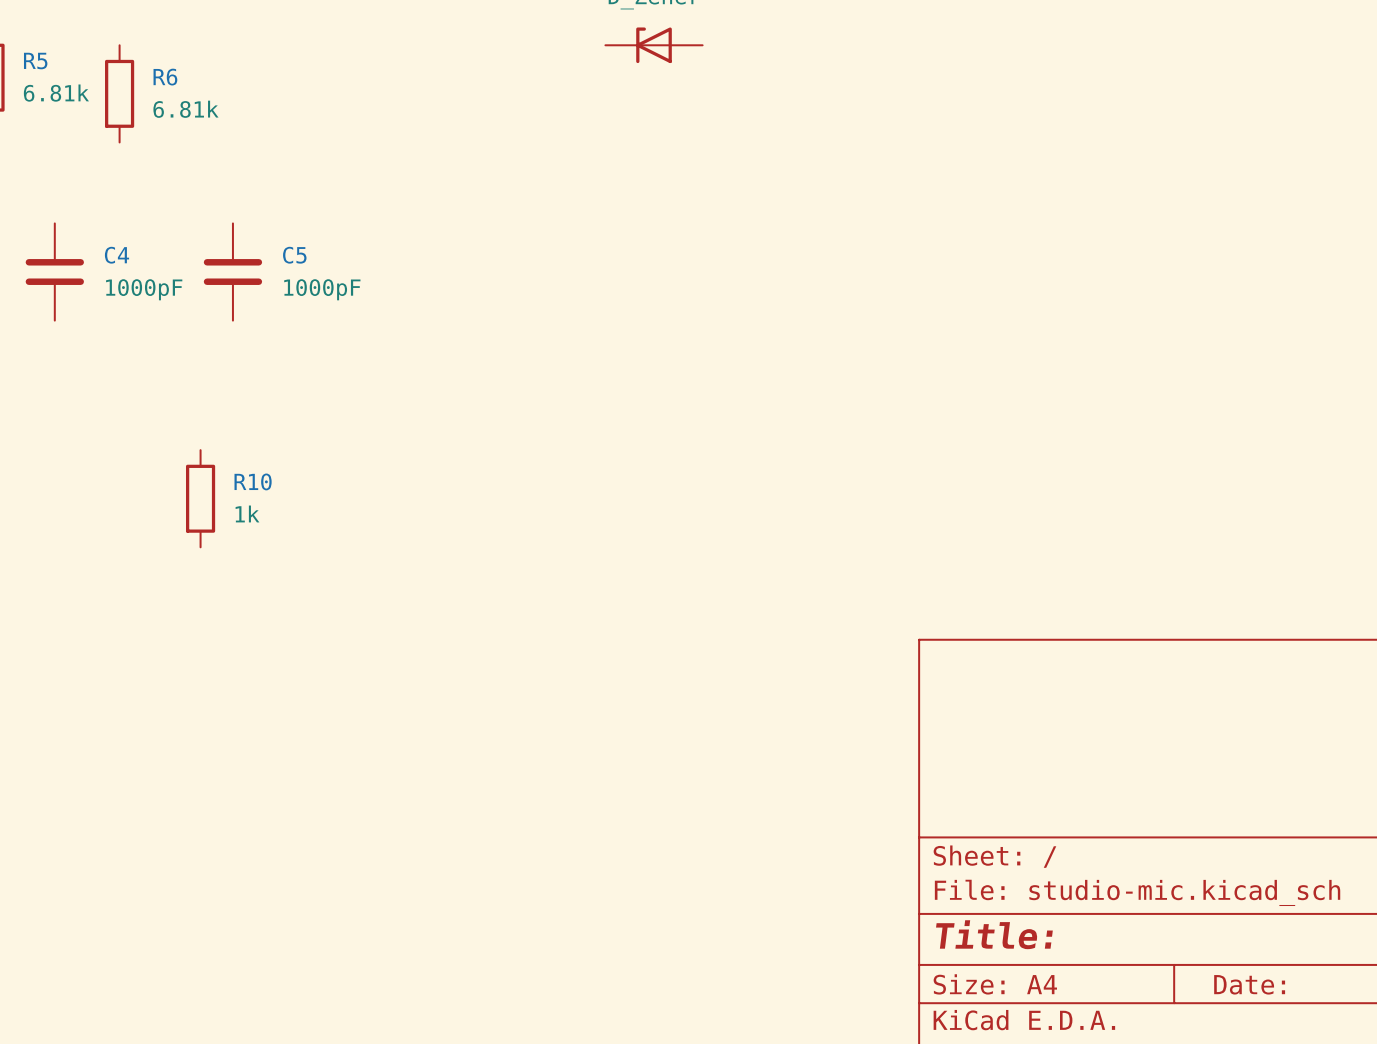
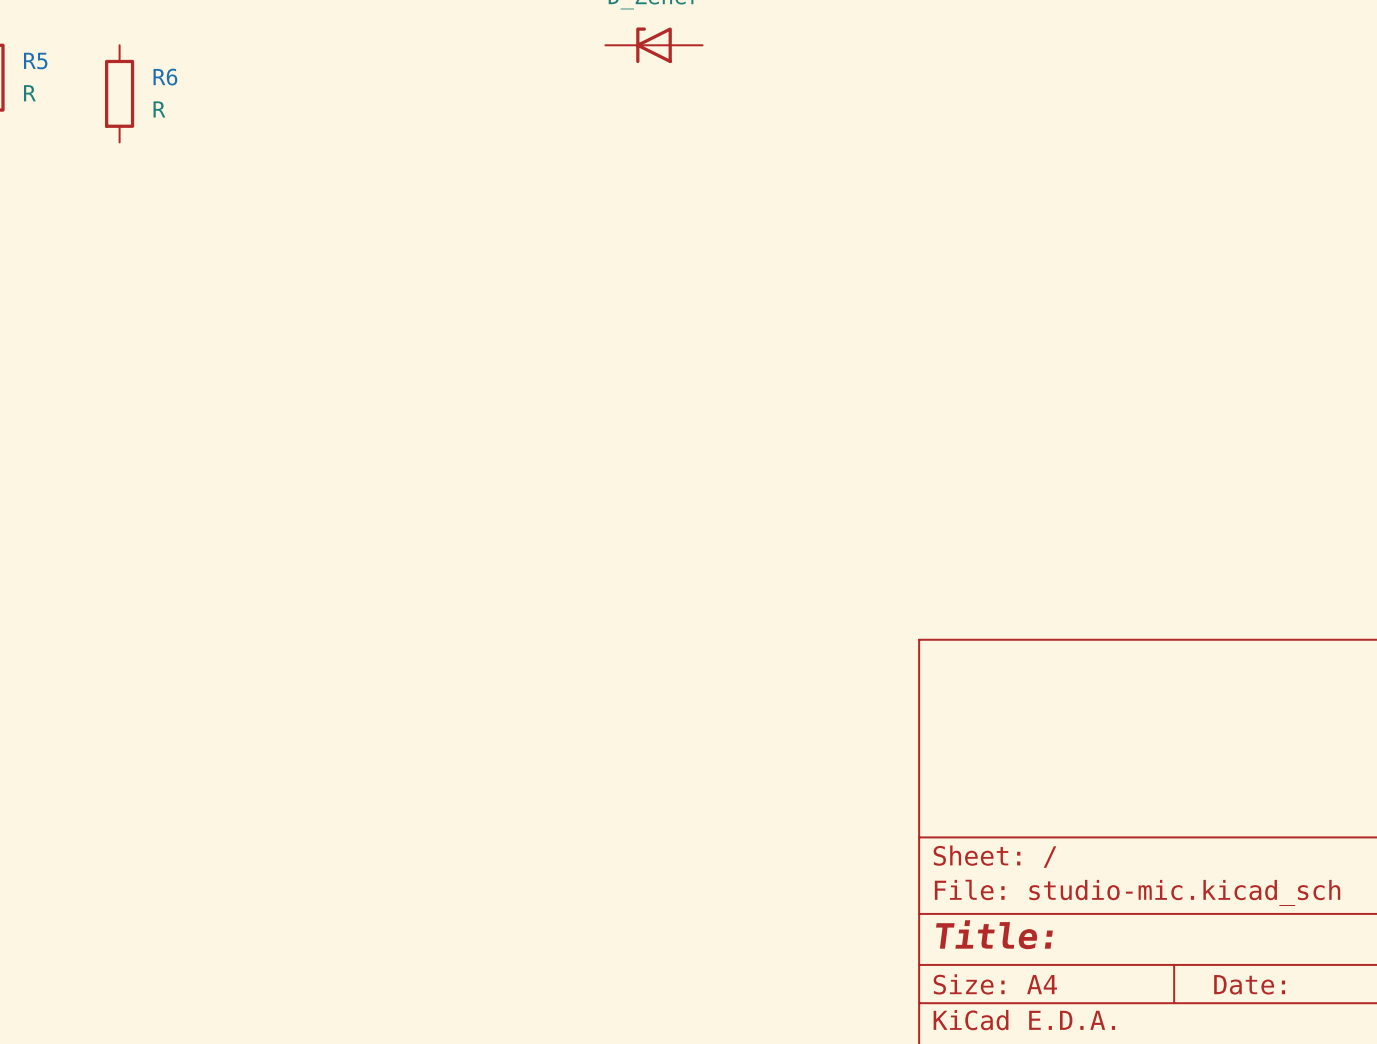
R5 value: 6.81k (56, 93) -> R (29, 93)
R6 value: 6.81k (185, 109) -> R (159, 109)
C4: 1000pF (54, 272) -> none
C5: 1000pF (232, 272) -> none
R10: 1k (200, 498) -> none

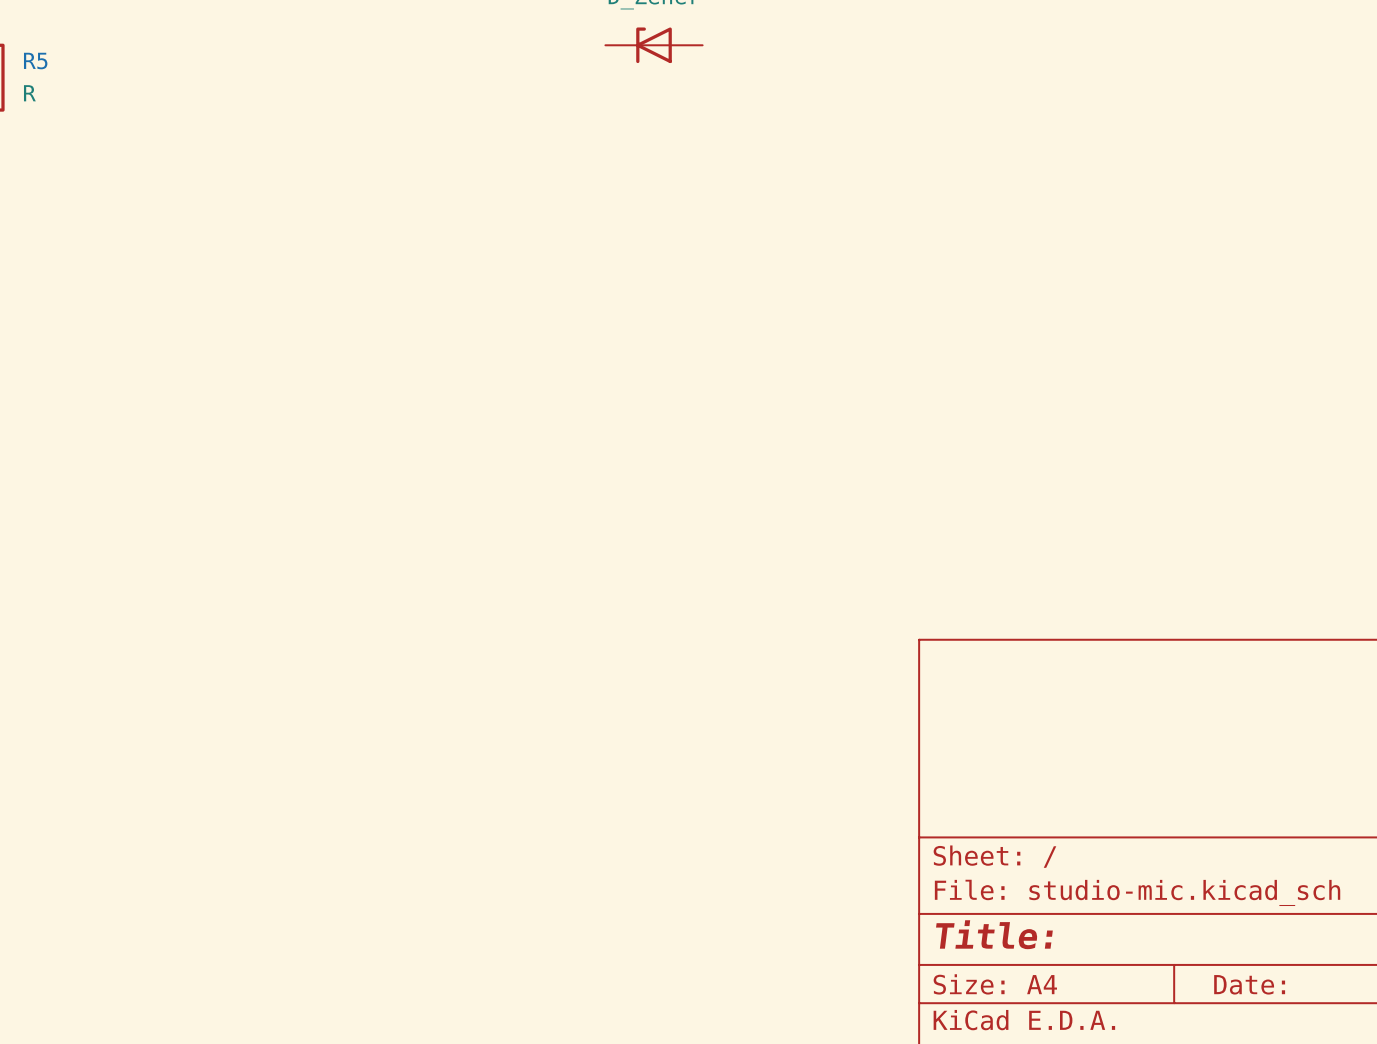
R6: R (119, 93) -> none

